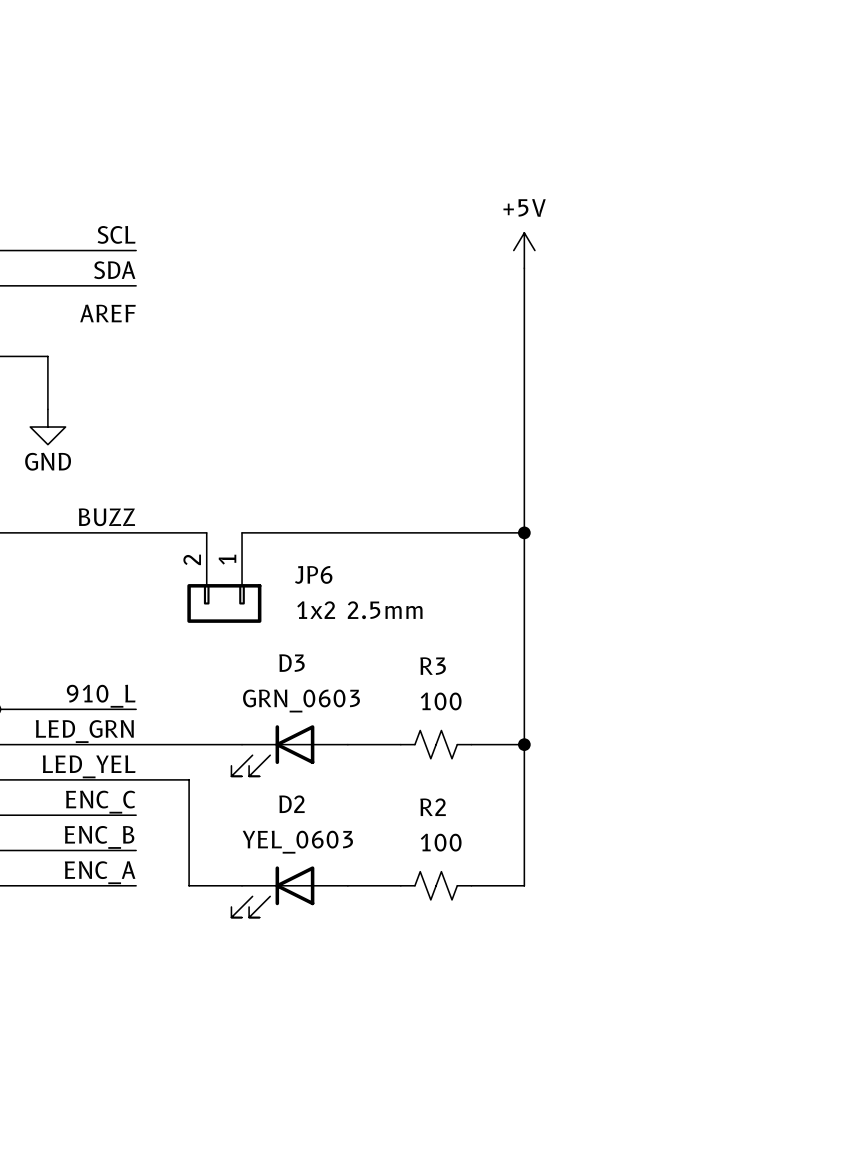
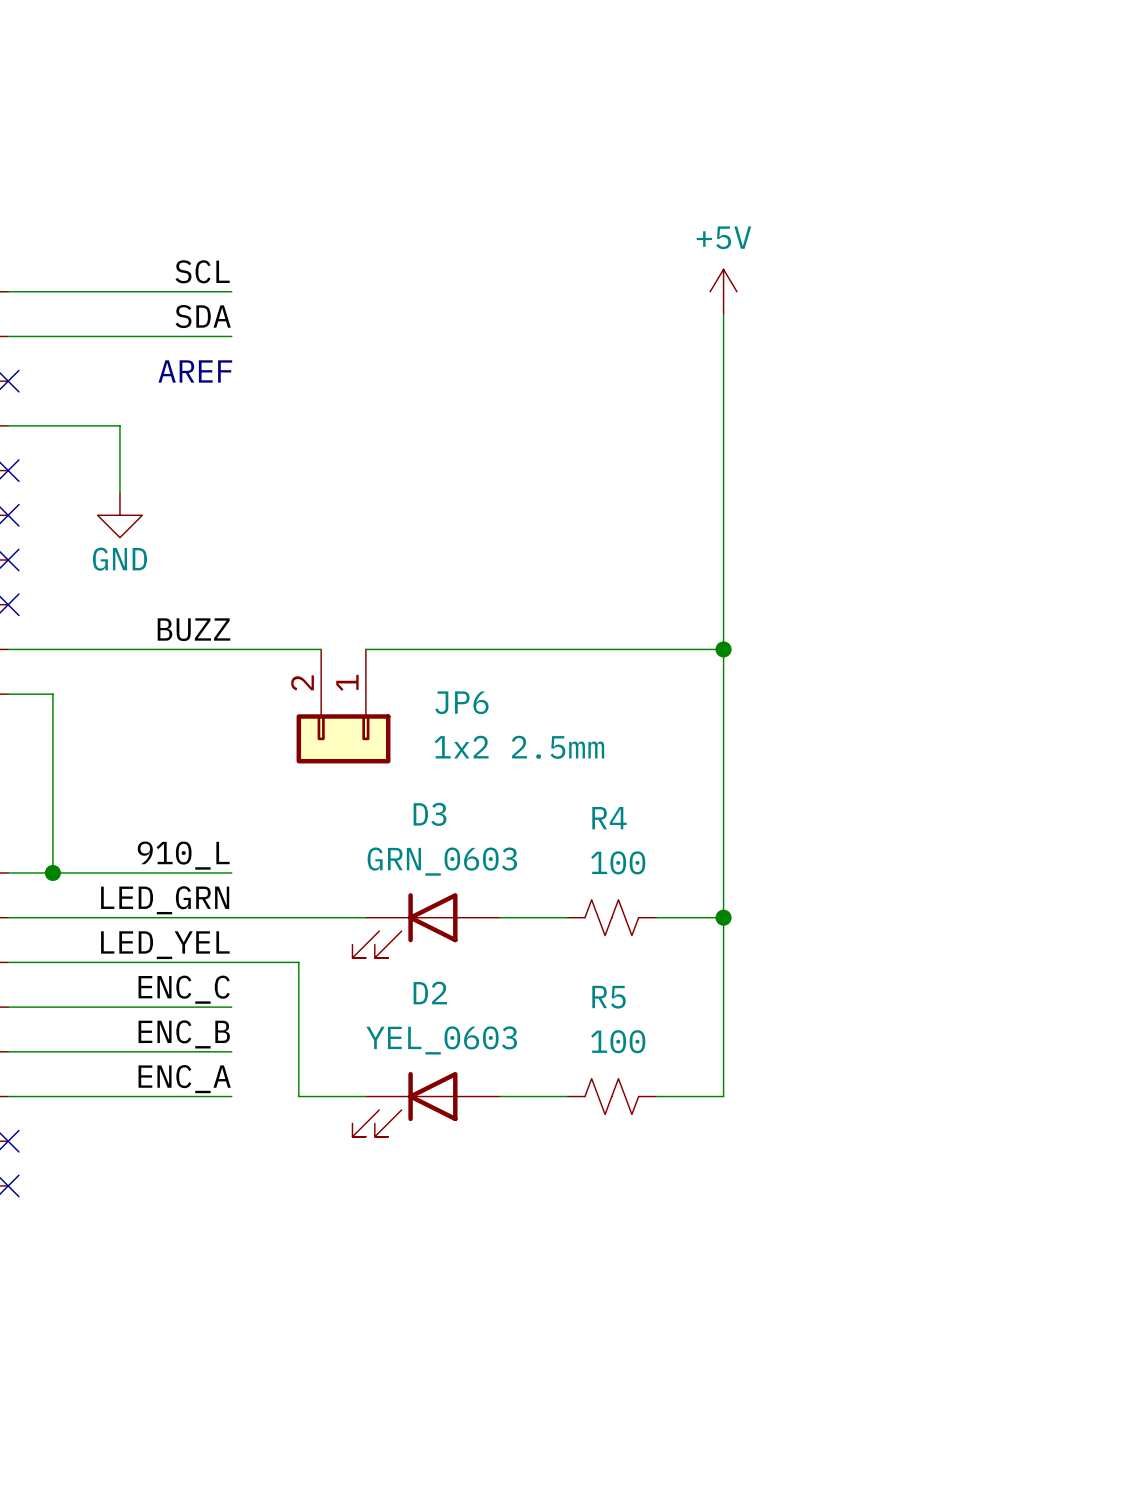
R3 name: R3 (433, 666) -> R4 (609, 818)
R2 name: R2 (433, 807) -> R5 (609, 997)

